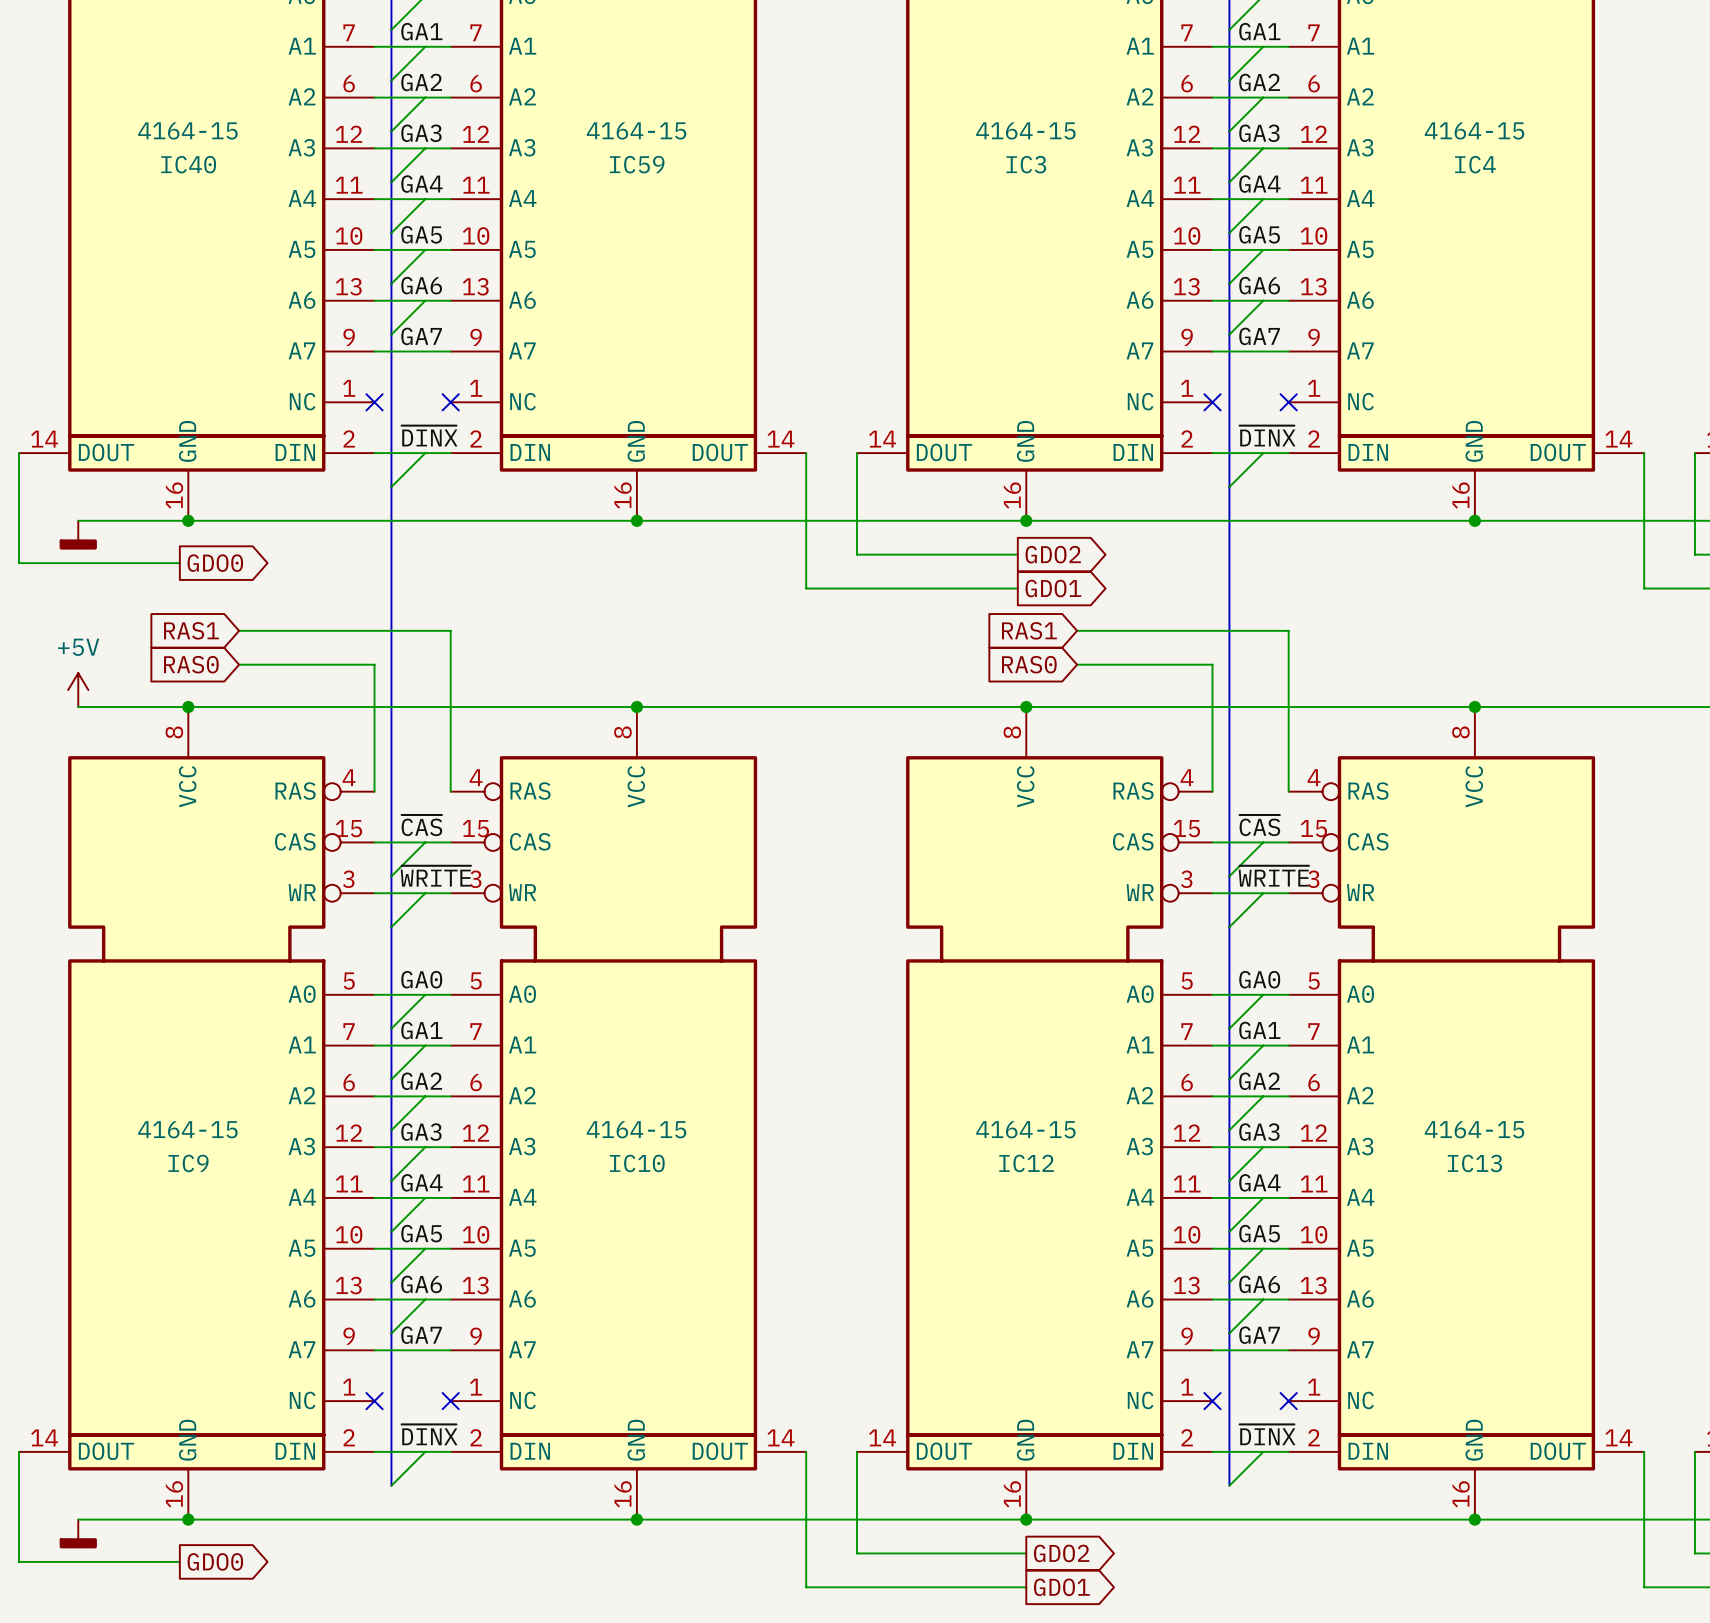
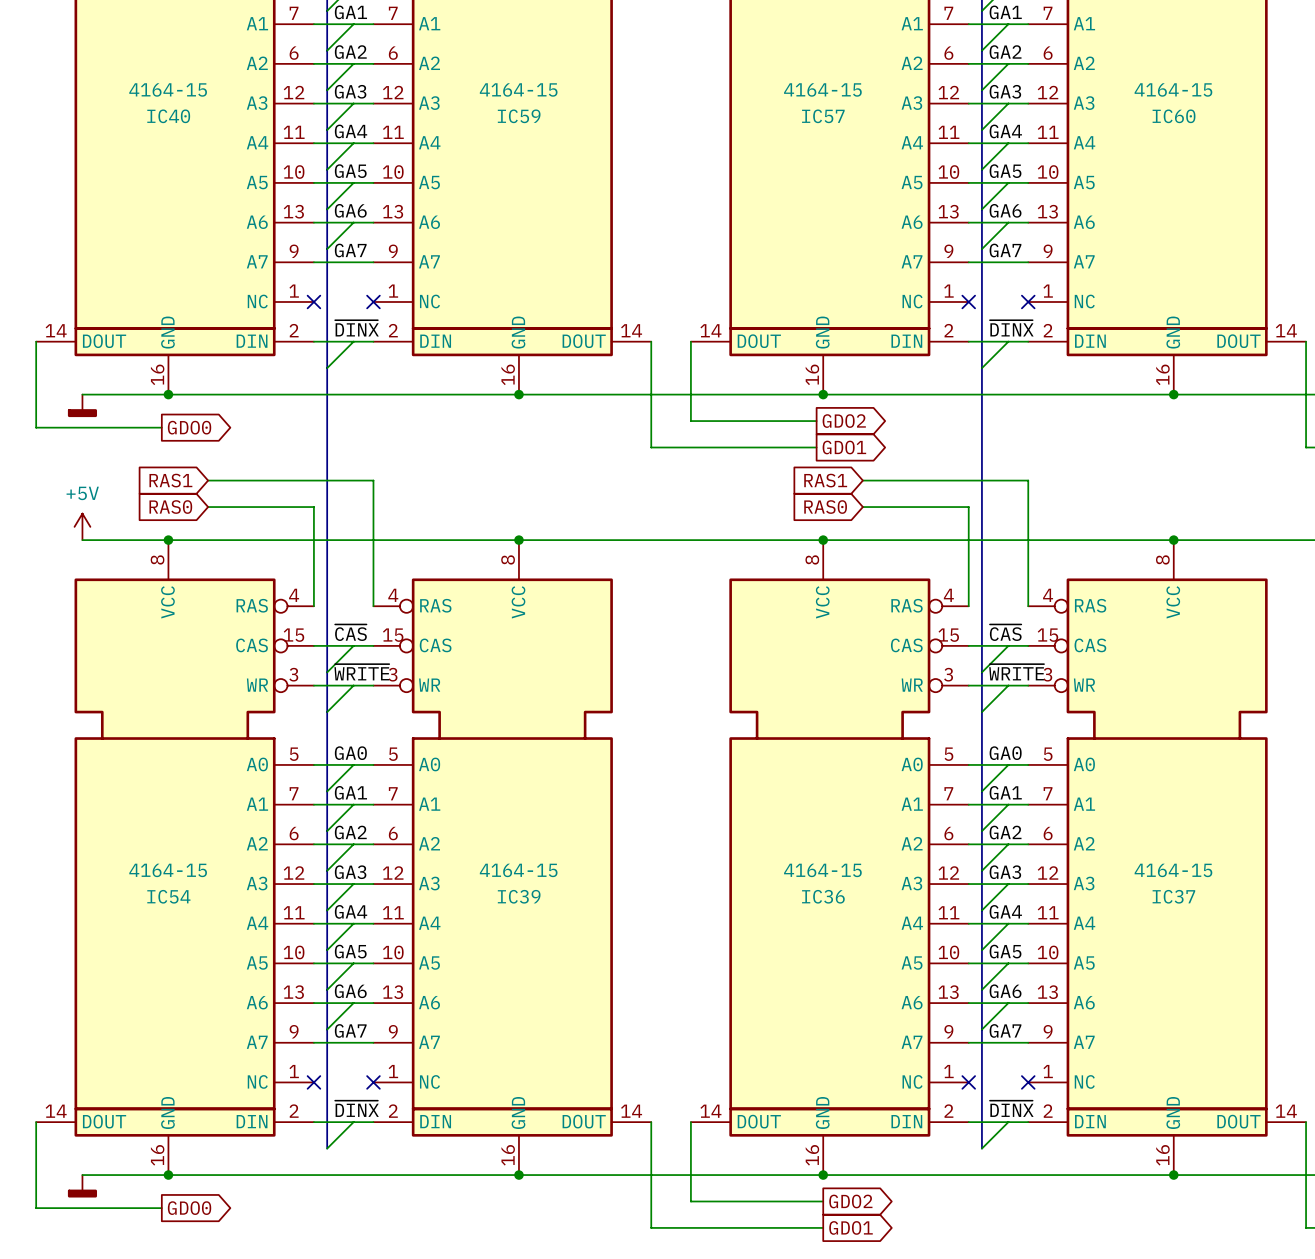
IC3 name: IC3 (1026, 164) -> IC57 (823, 116)
IC4 name: IC4 (1475, 164) -> IC60 (1174, 116)
IC9 name: IC9 (188, 1163) -> IC54 (168, 896)
IC10 name: IC10 (637, 1163) -> IC39 (519, 896)
IC12 name: IC12 (1026, 1163) -> IC36 (823, 896)
IC13 name: IC13 (1474, 1163) -> IC37 (1173, 896)

